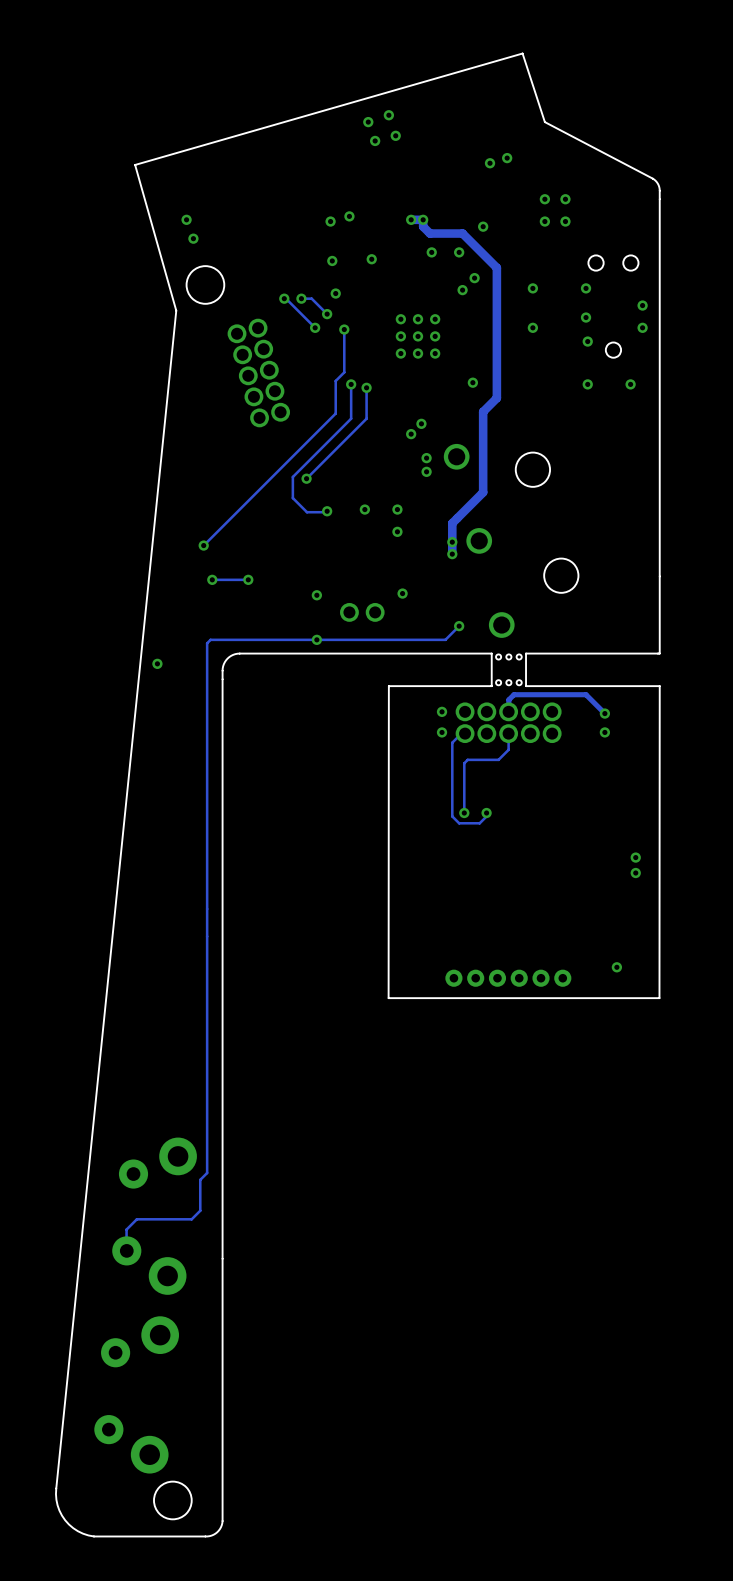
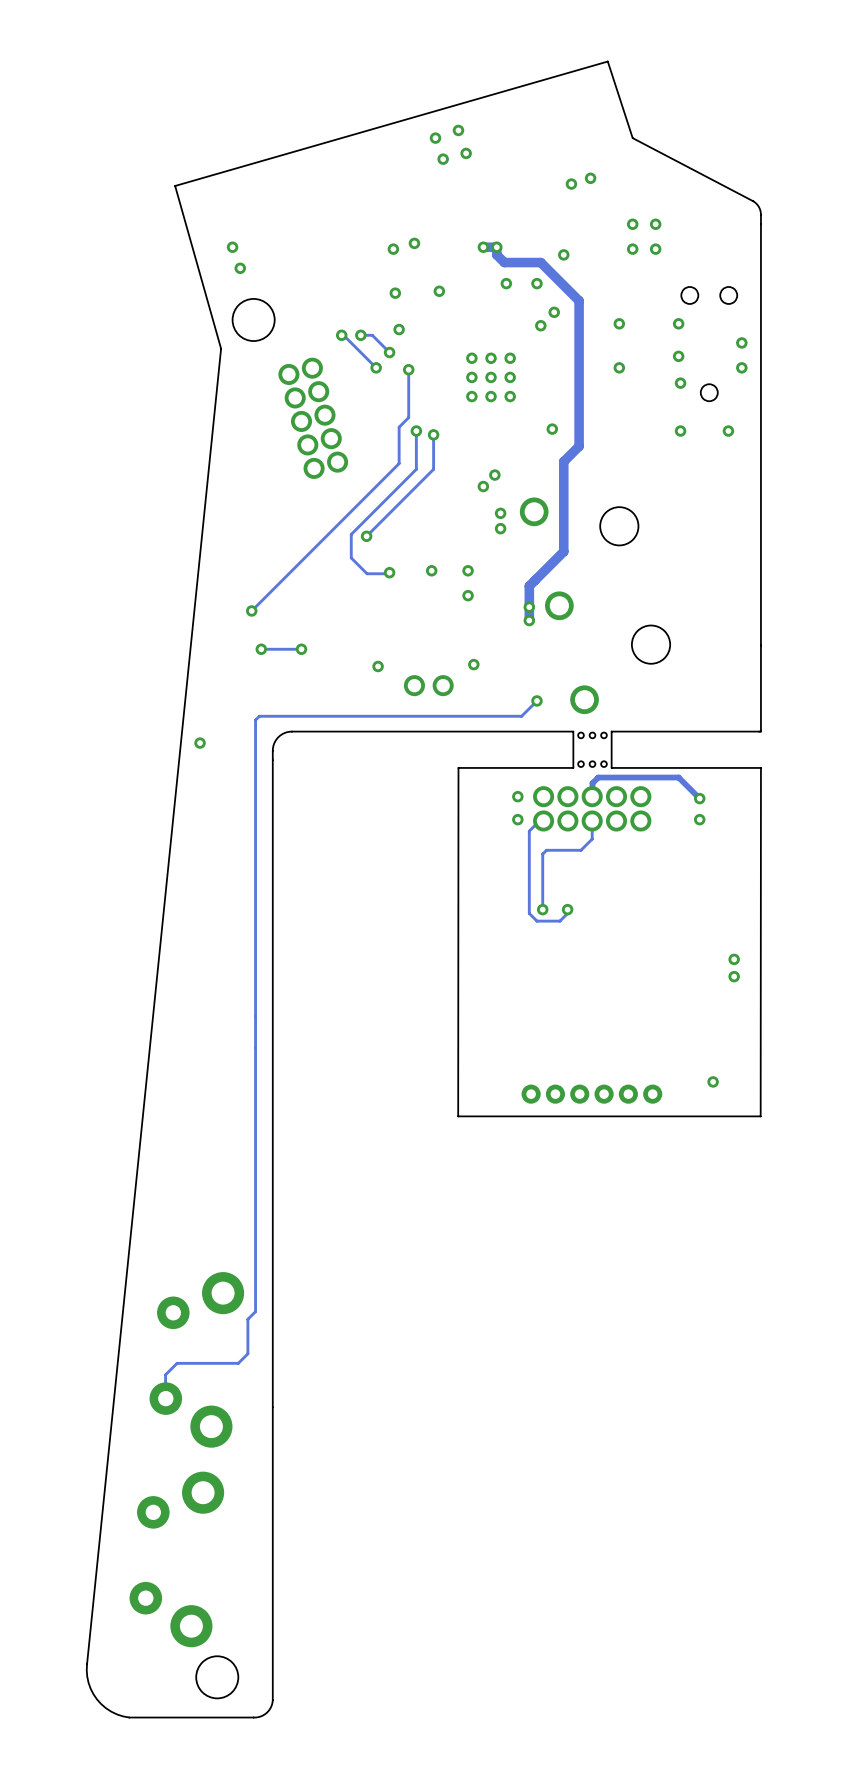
via: (316, 639) -> none

